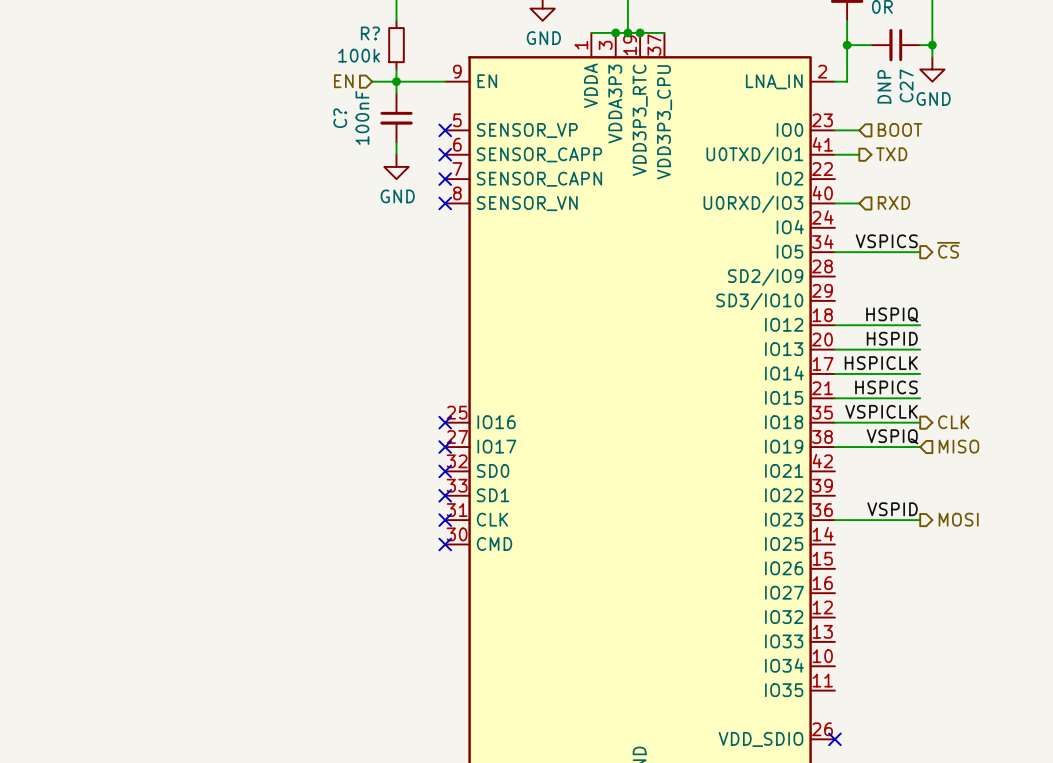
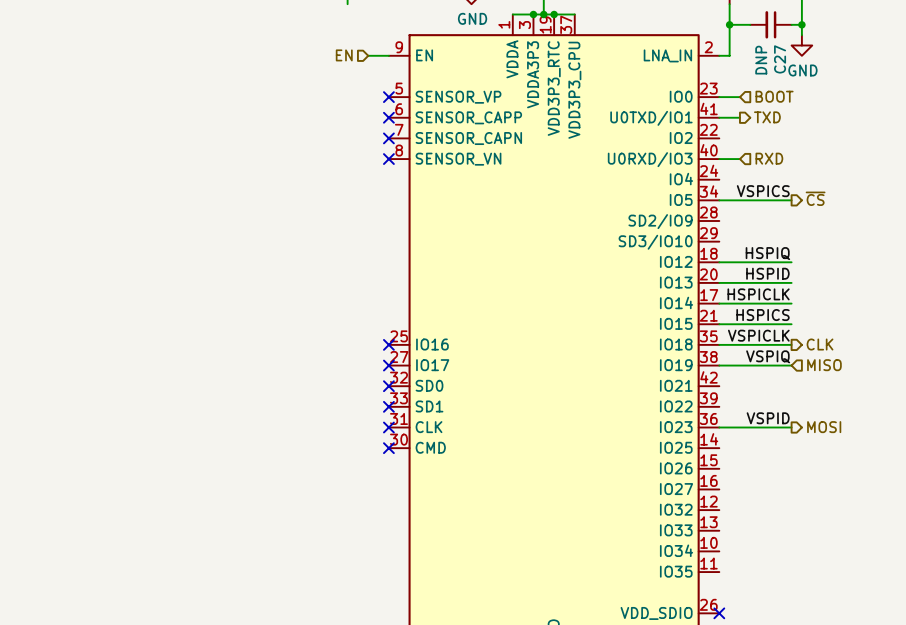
R?: 100k (396, 45) -> none
wire: (396, 69) (396, 93) -> none
hierarchical label position: EN (343, 81) -> EN (344, 55)
wire: (372, 81) (420, 81) -> none
junction: (396, 81) -> none
C?: 100nF (396, 118) -> none
wire: (396, 142) (396, 154) -> none
power symbol: GND (396, 166) -> none

